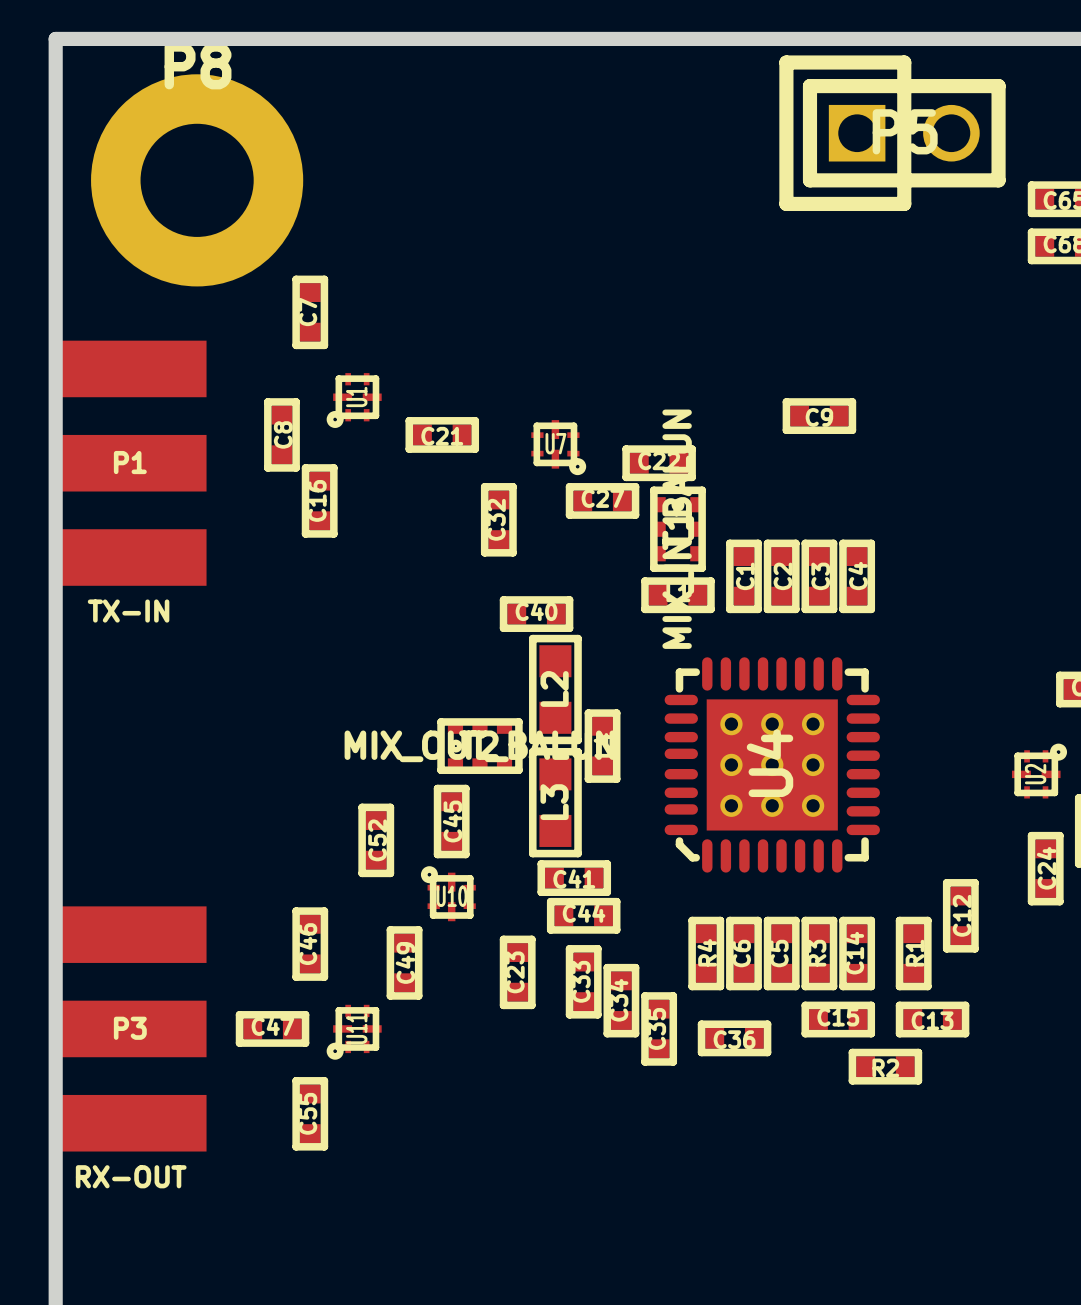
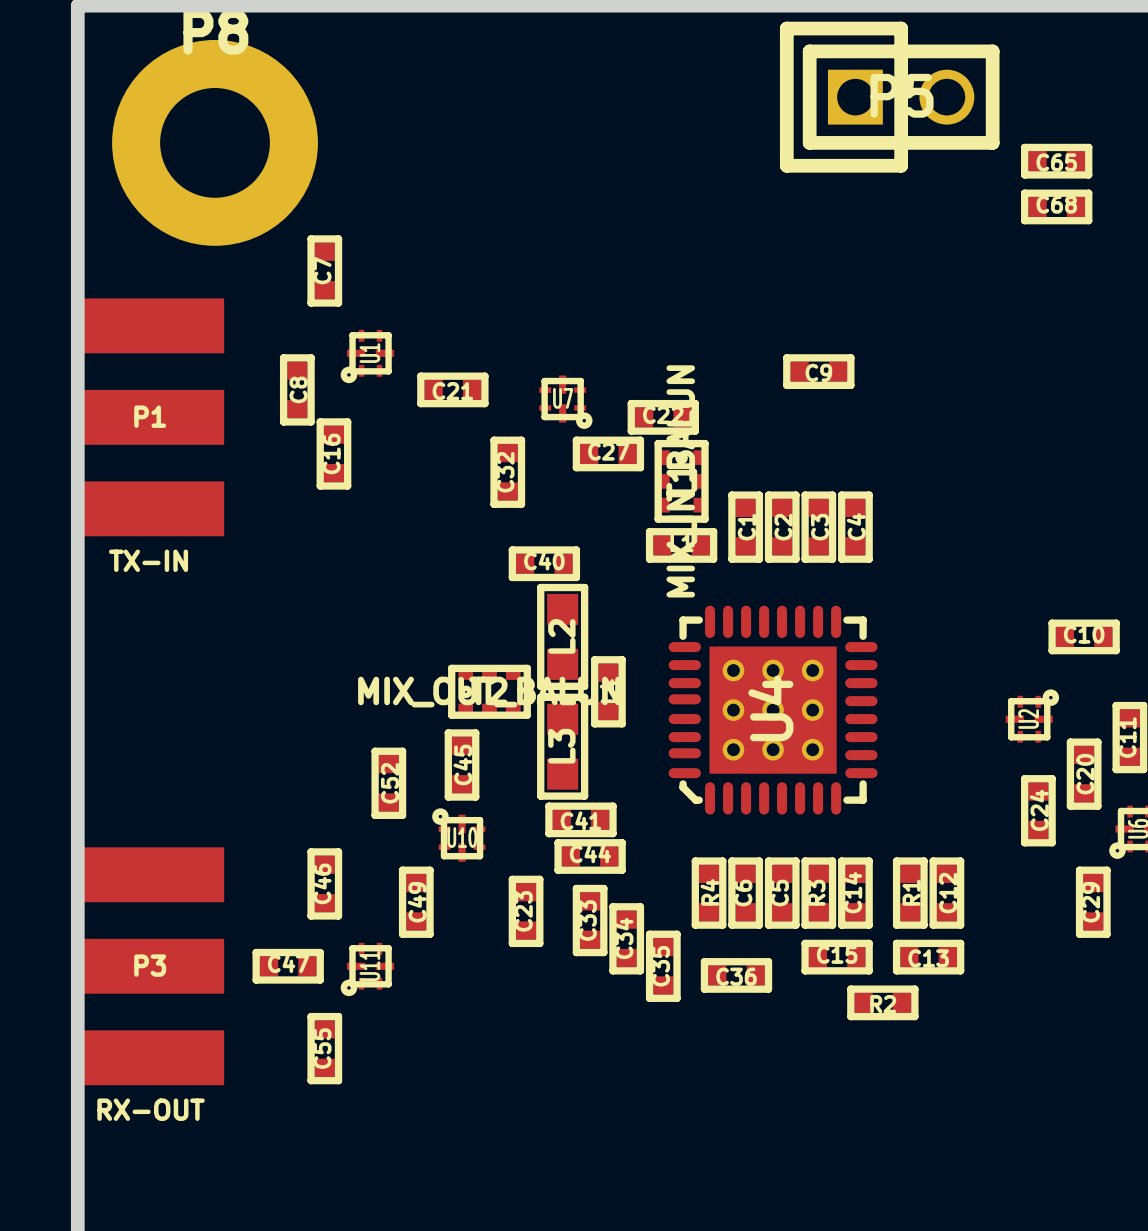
C12 position: (960, 915) -> (946, 893)

